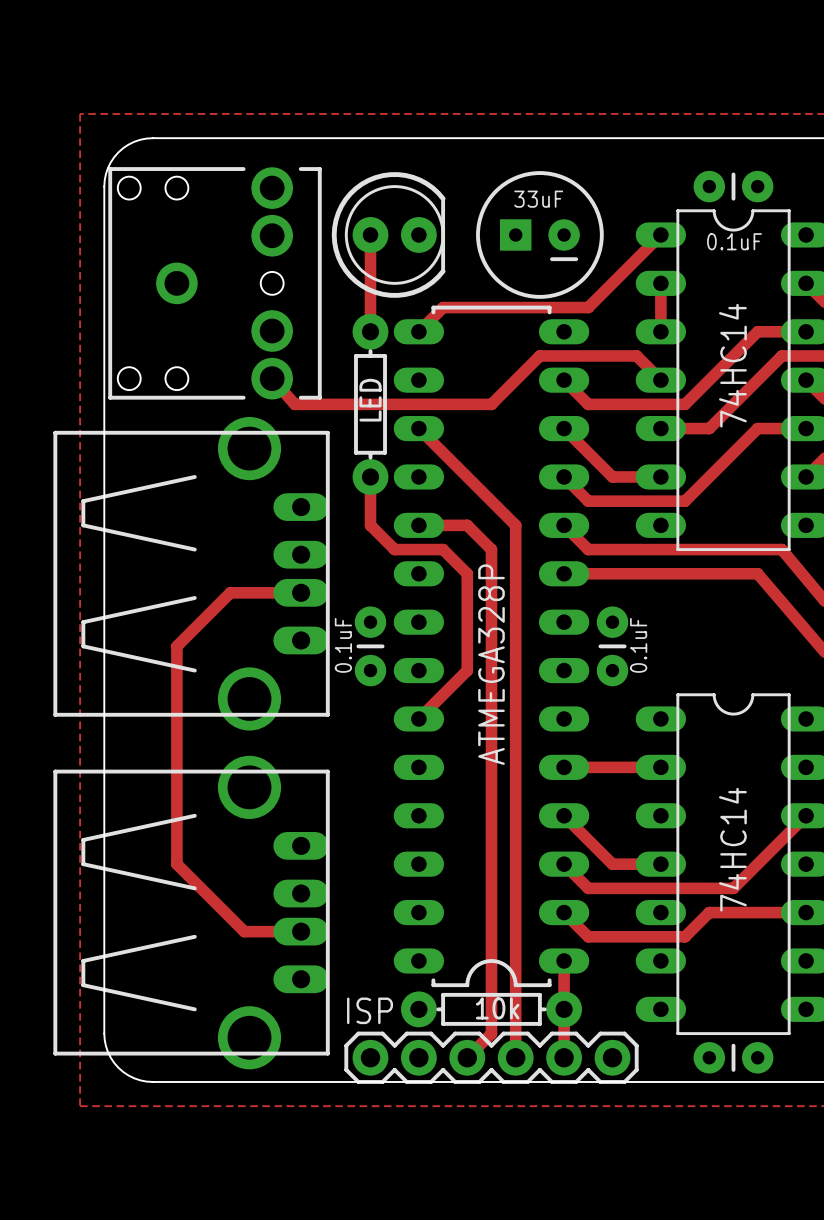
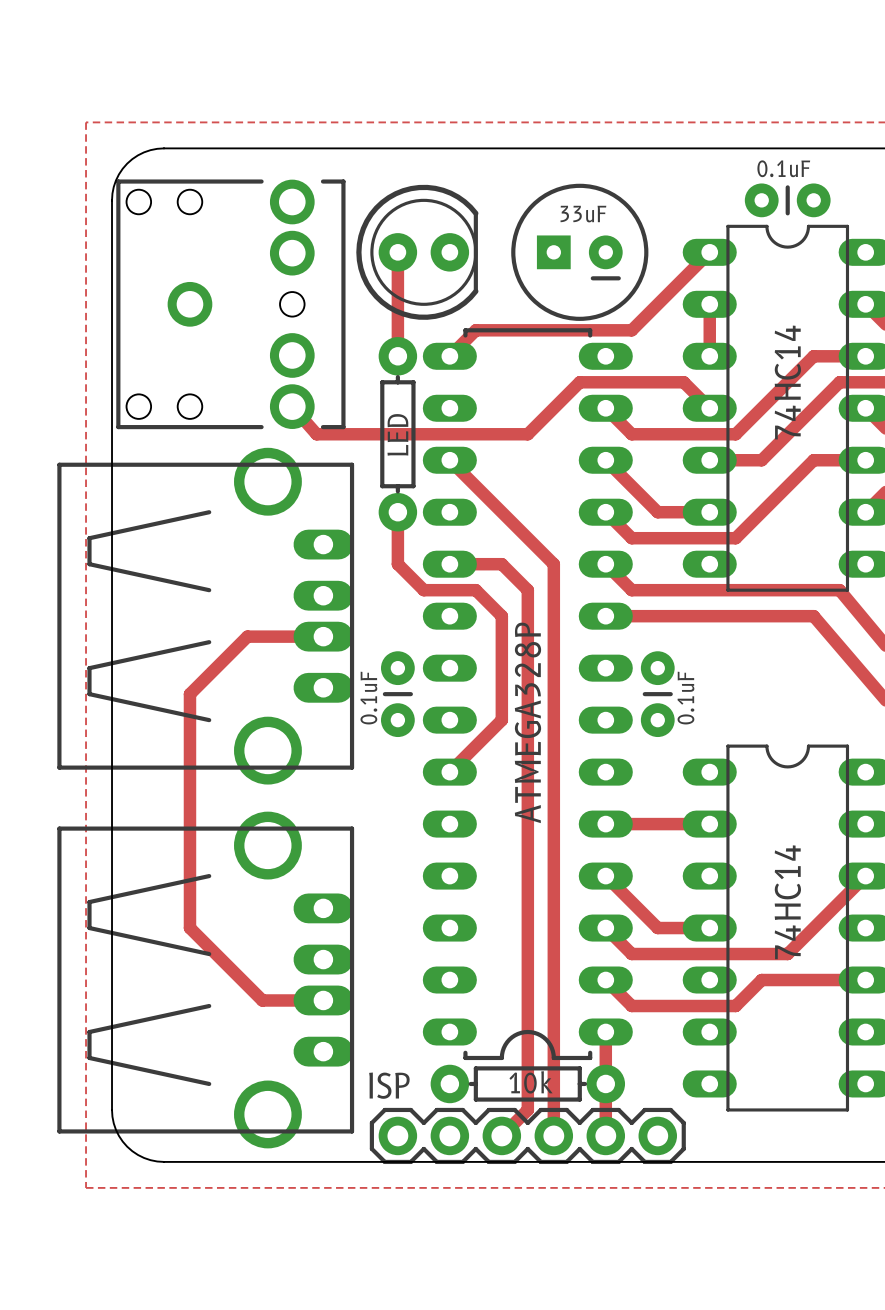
part value position: 0.1uF (734, 241) -> 0.1uF (783, 168)
part: (733, 1057) -> none

